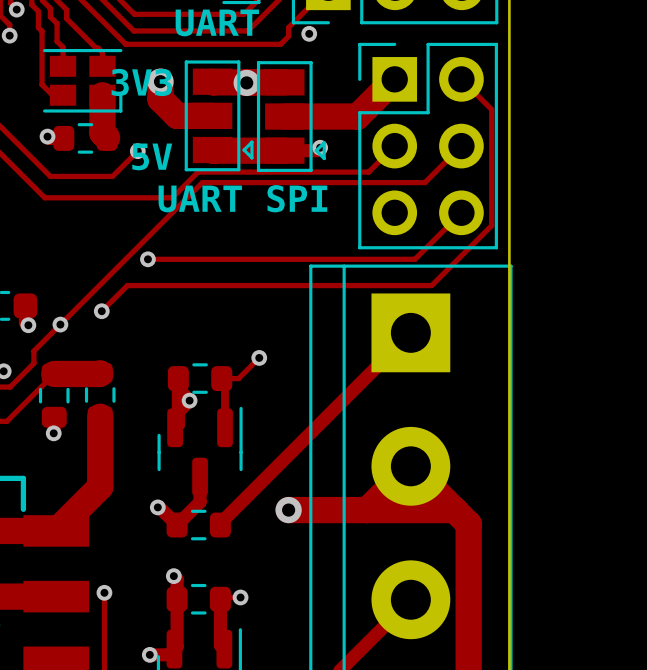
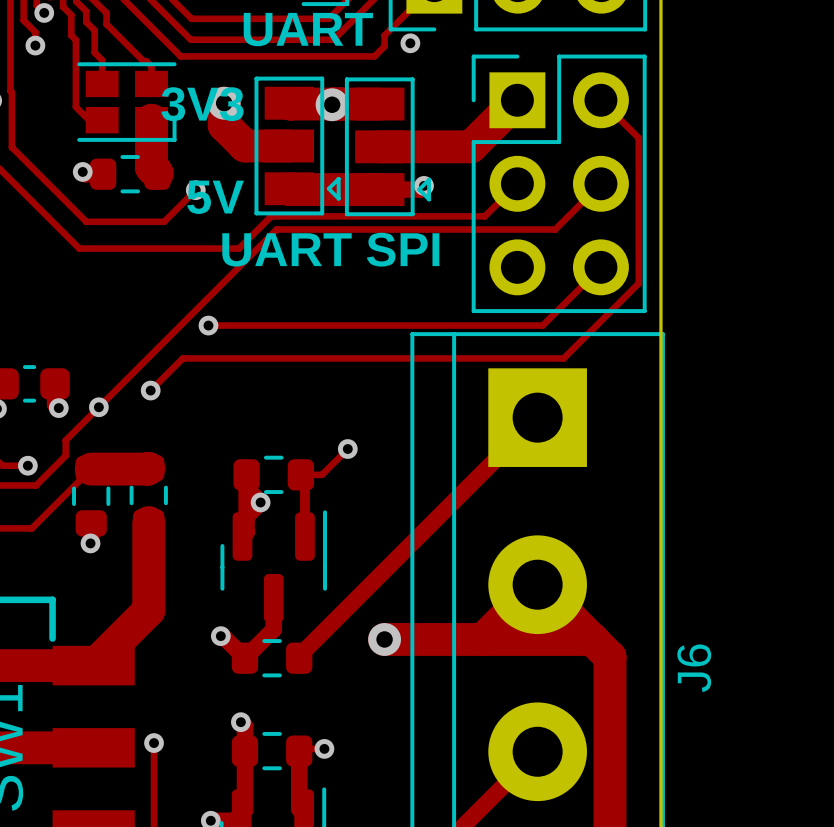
J6 name: none -> J6 (694, 668)

